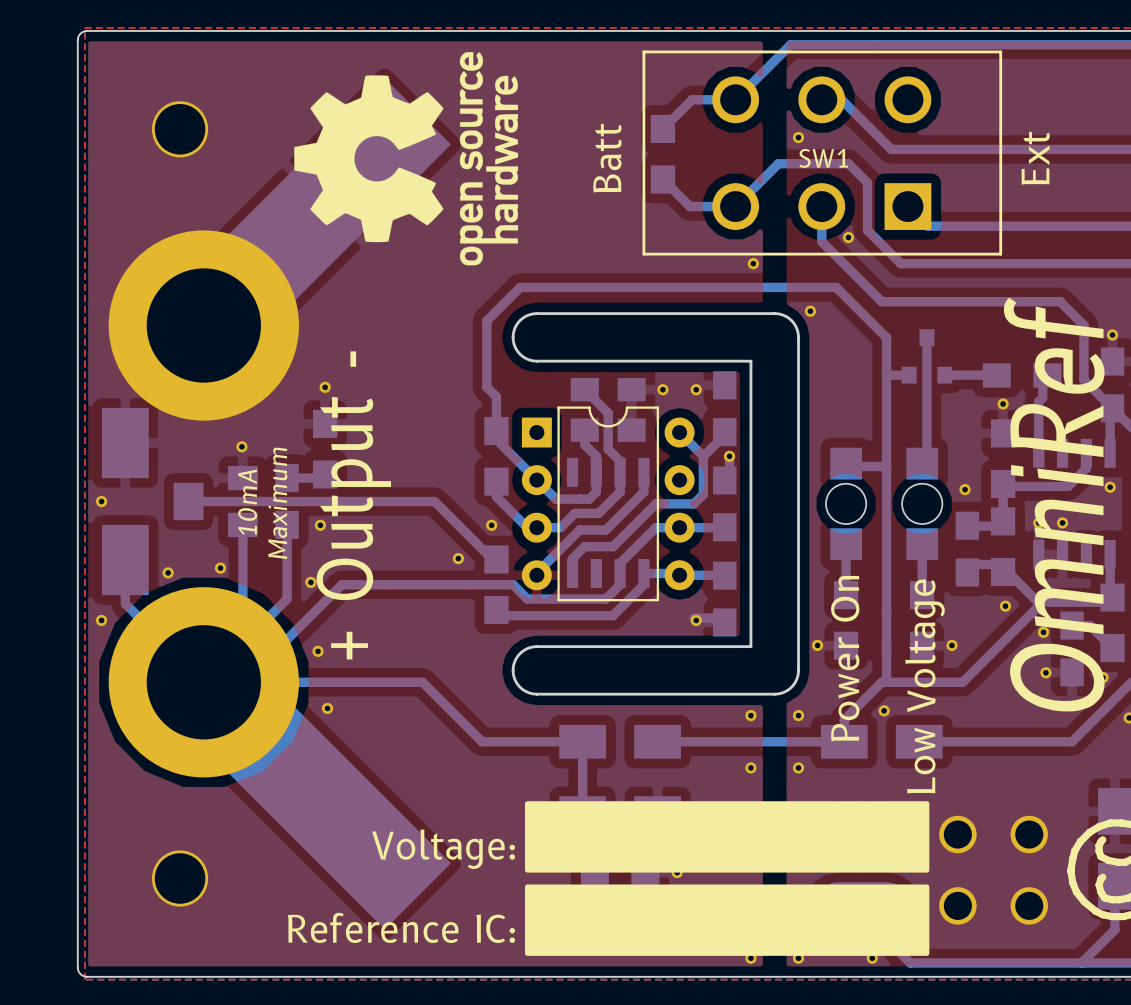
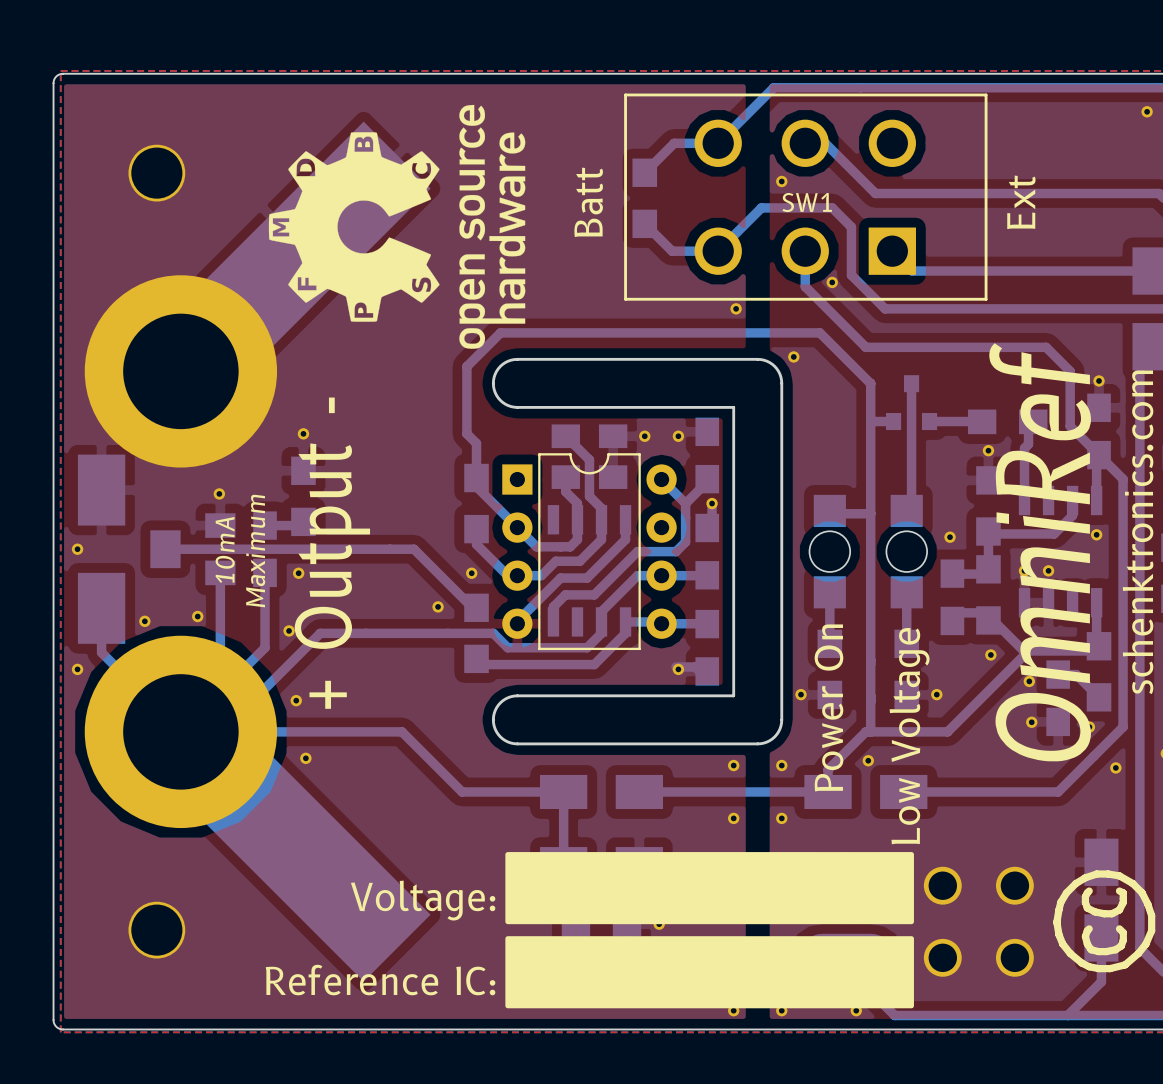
drawing: [294, 52, 519, 266] -> none
drawing: none -> [268, 104, 526, 349]

